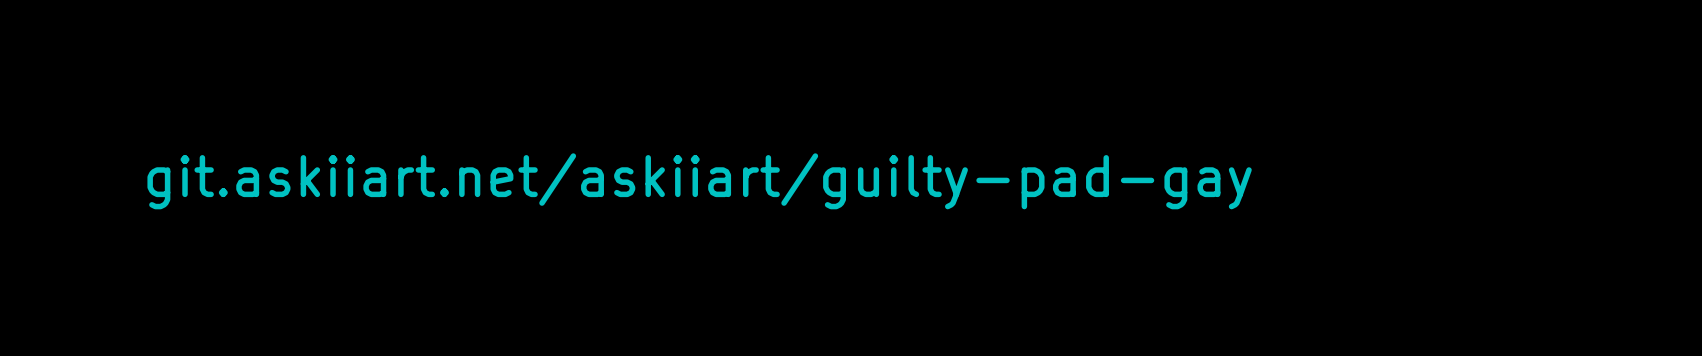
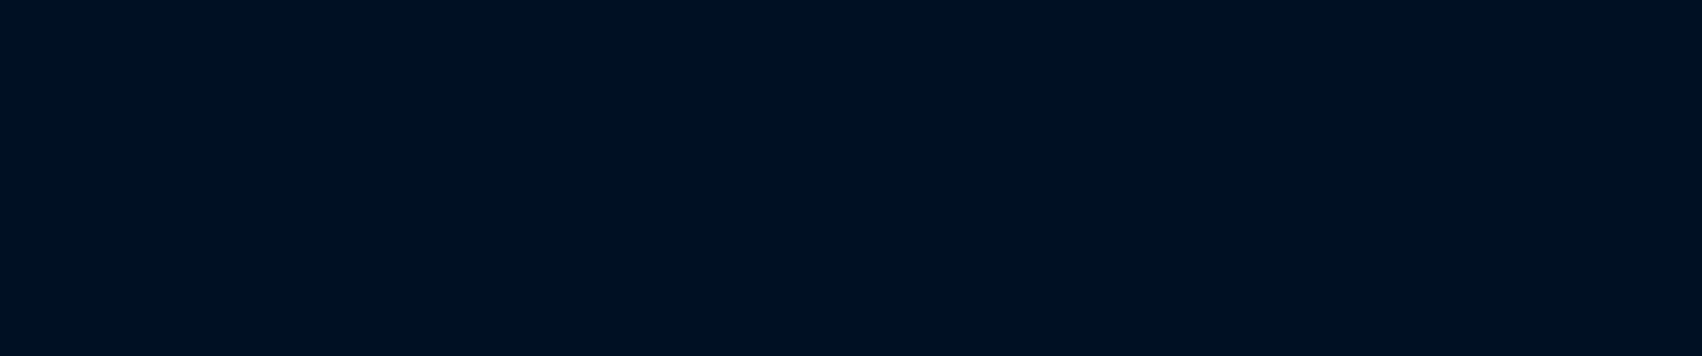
text: git.askiiart.net/askiiart/guilty-pad-gay (699, 181) -> none

